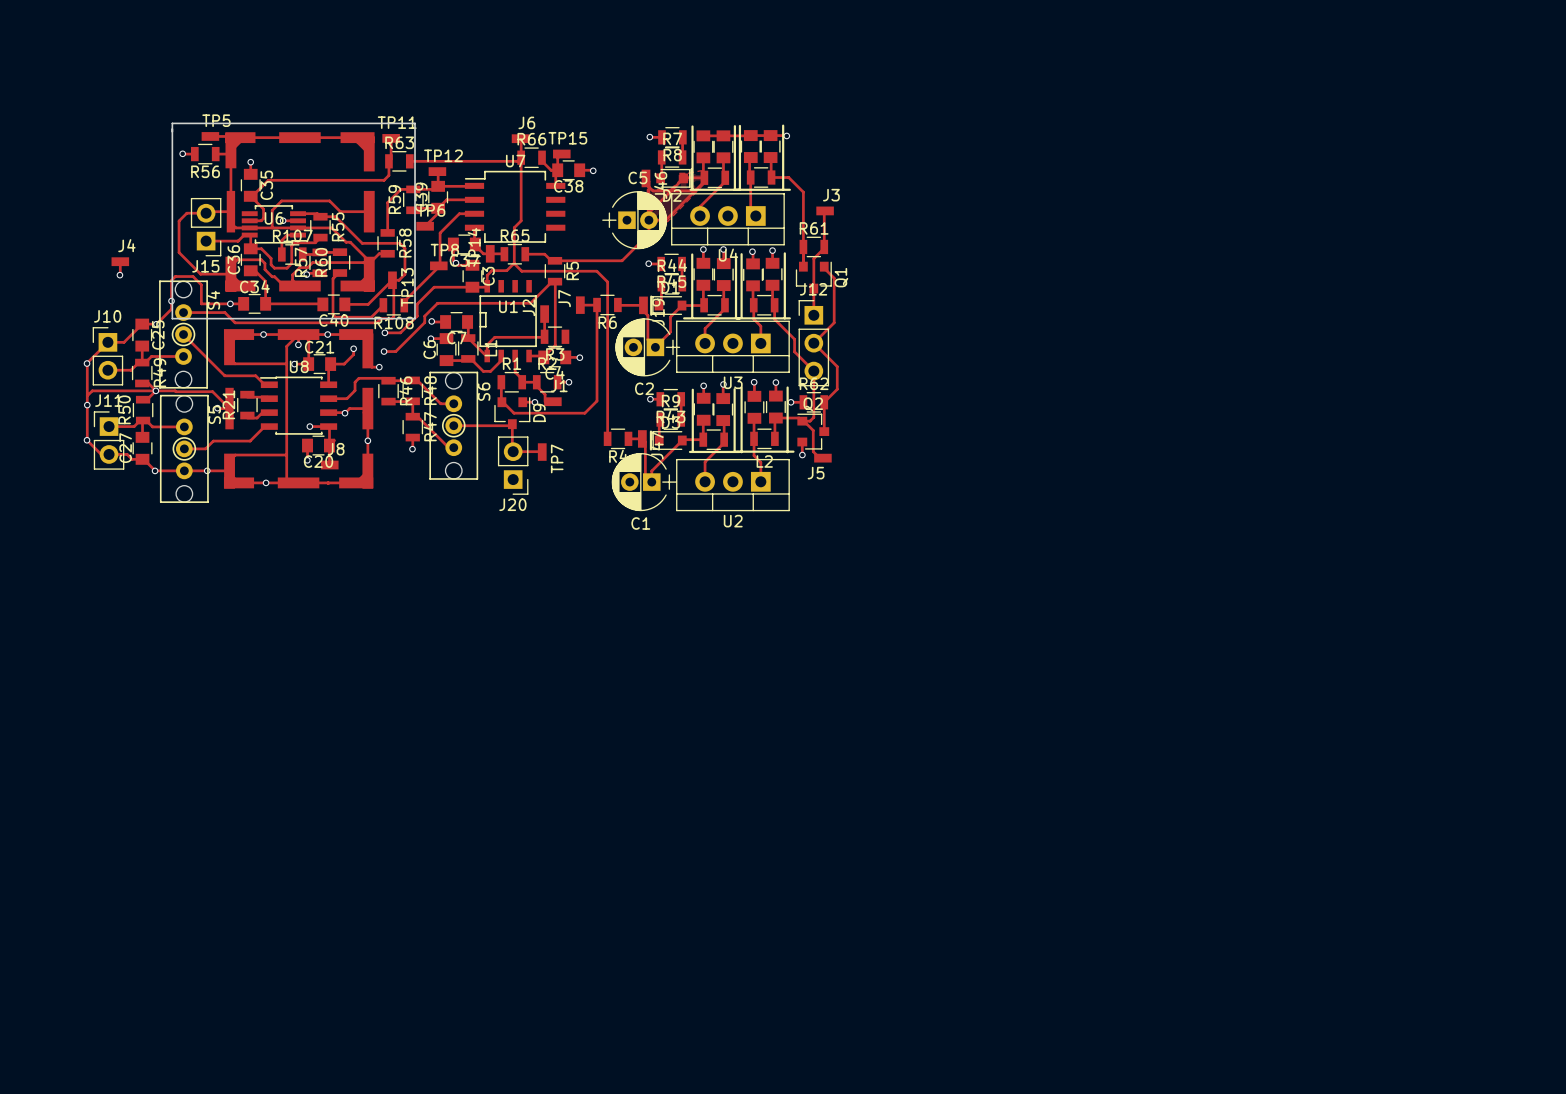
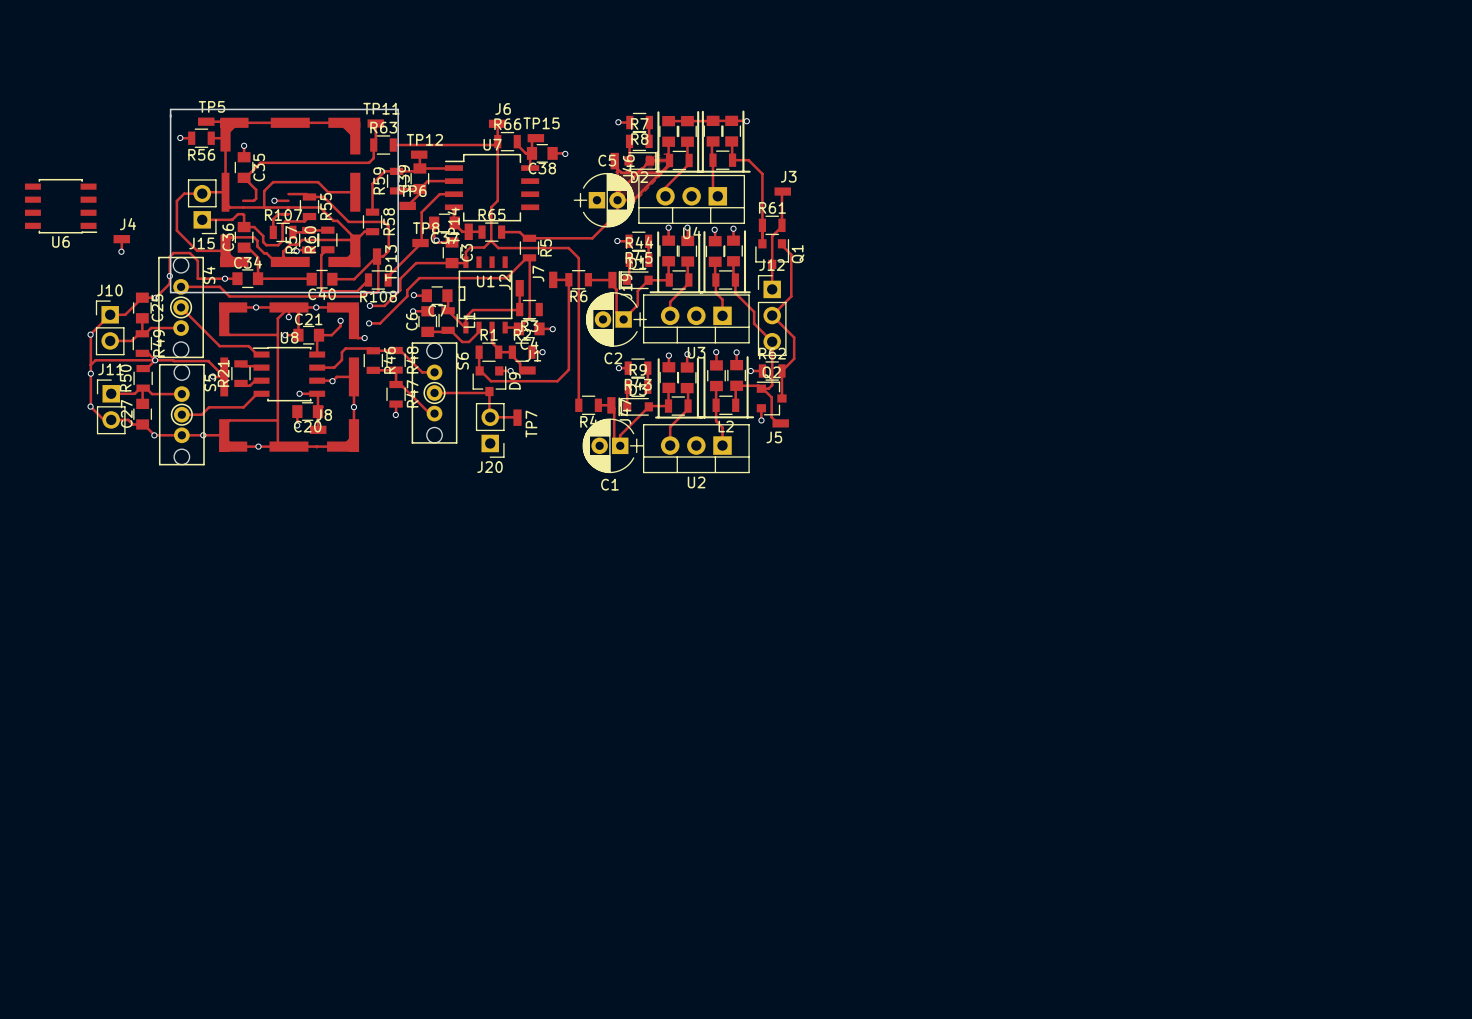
U6 footprint: [241, 205, 307, 244] -> [24, 178, 98, 234]
U6 name position: U6 (274, 218) -> U6 (60, 241)

